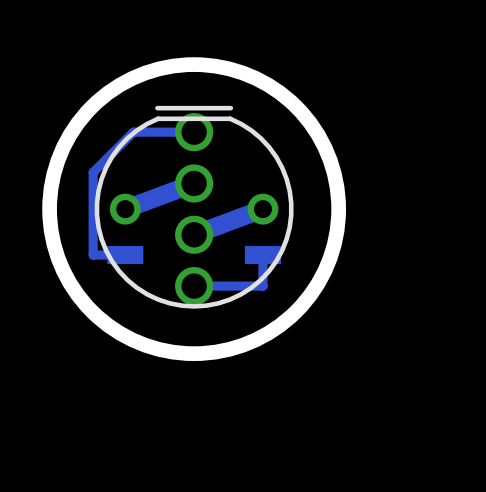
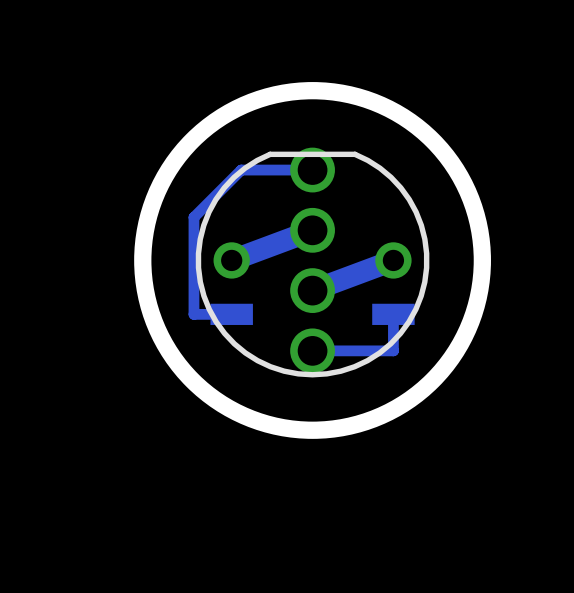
line: (157, 108) (230, 108) -> none

